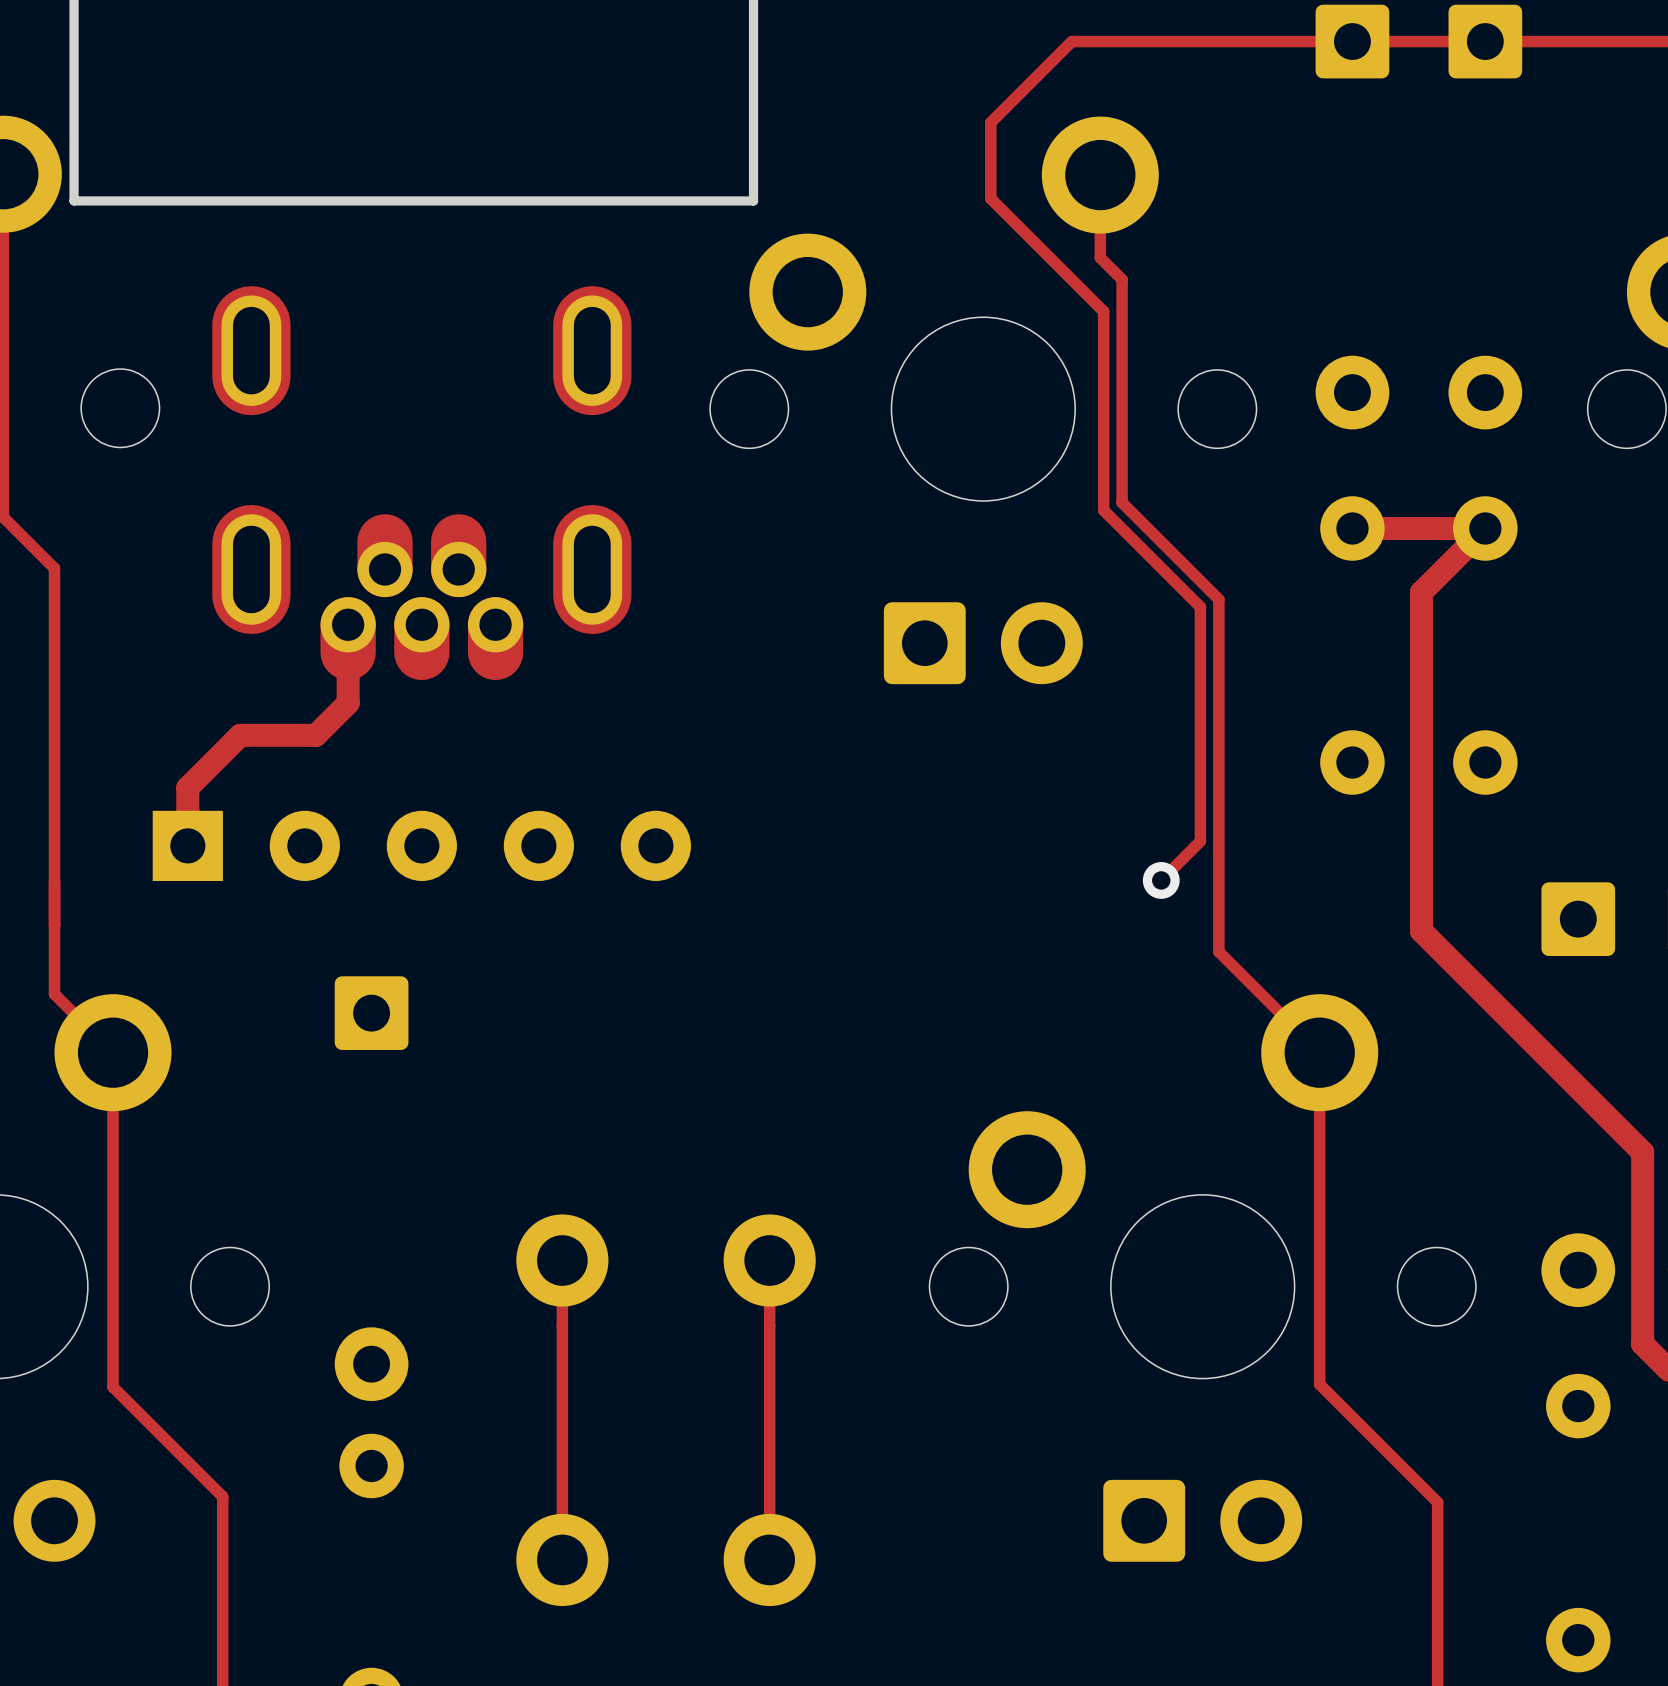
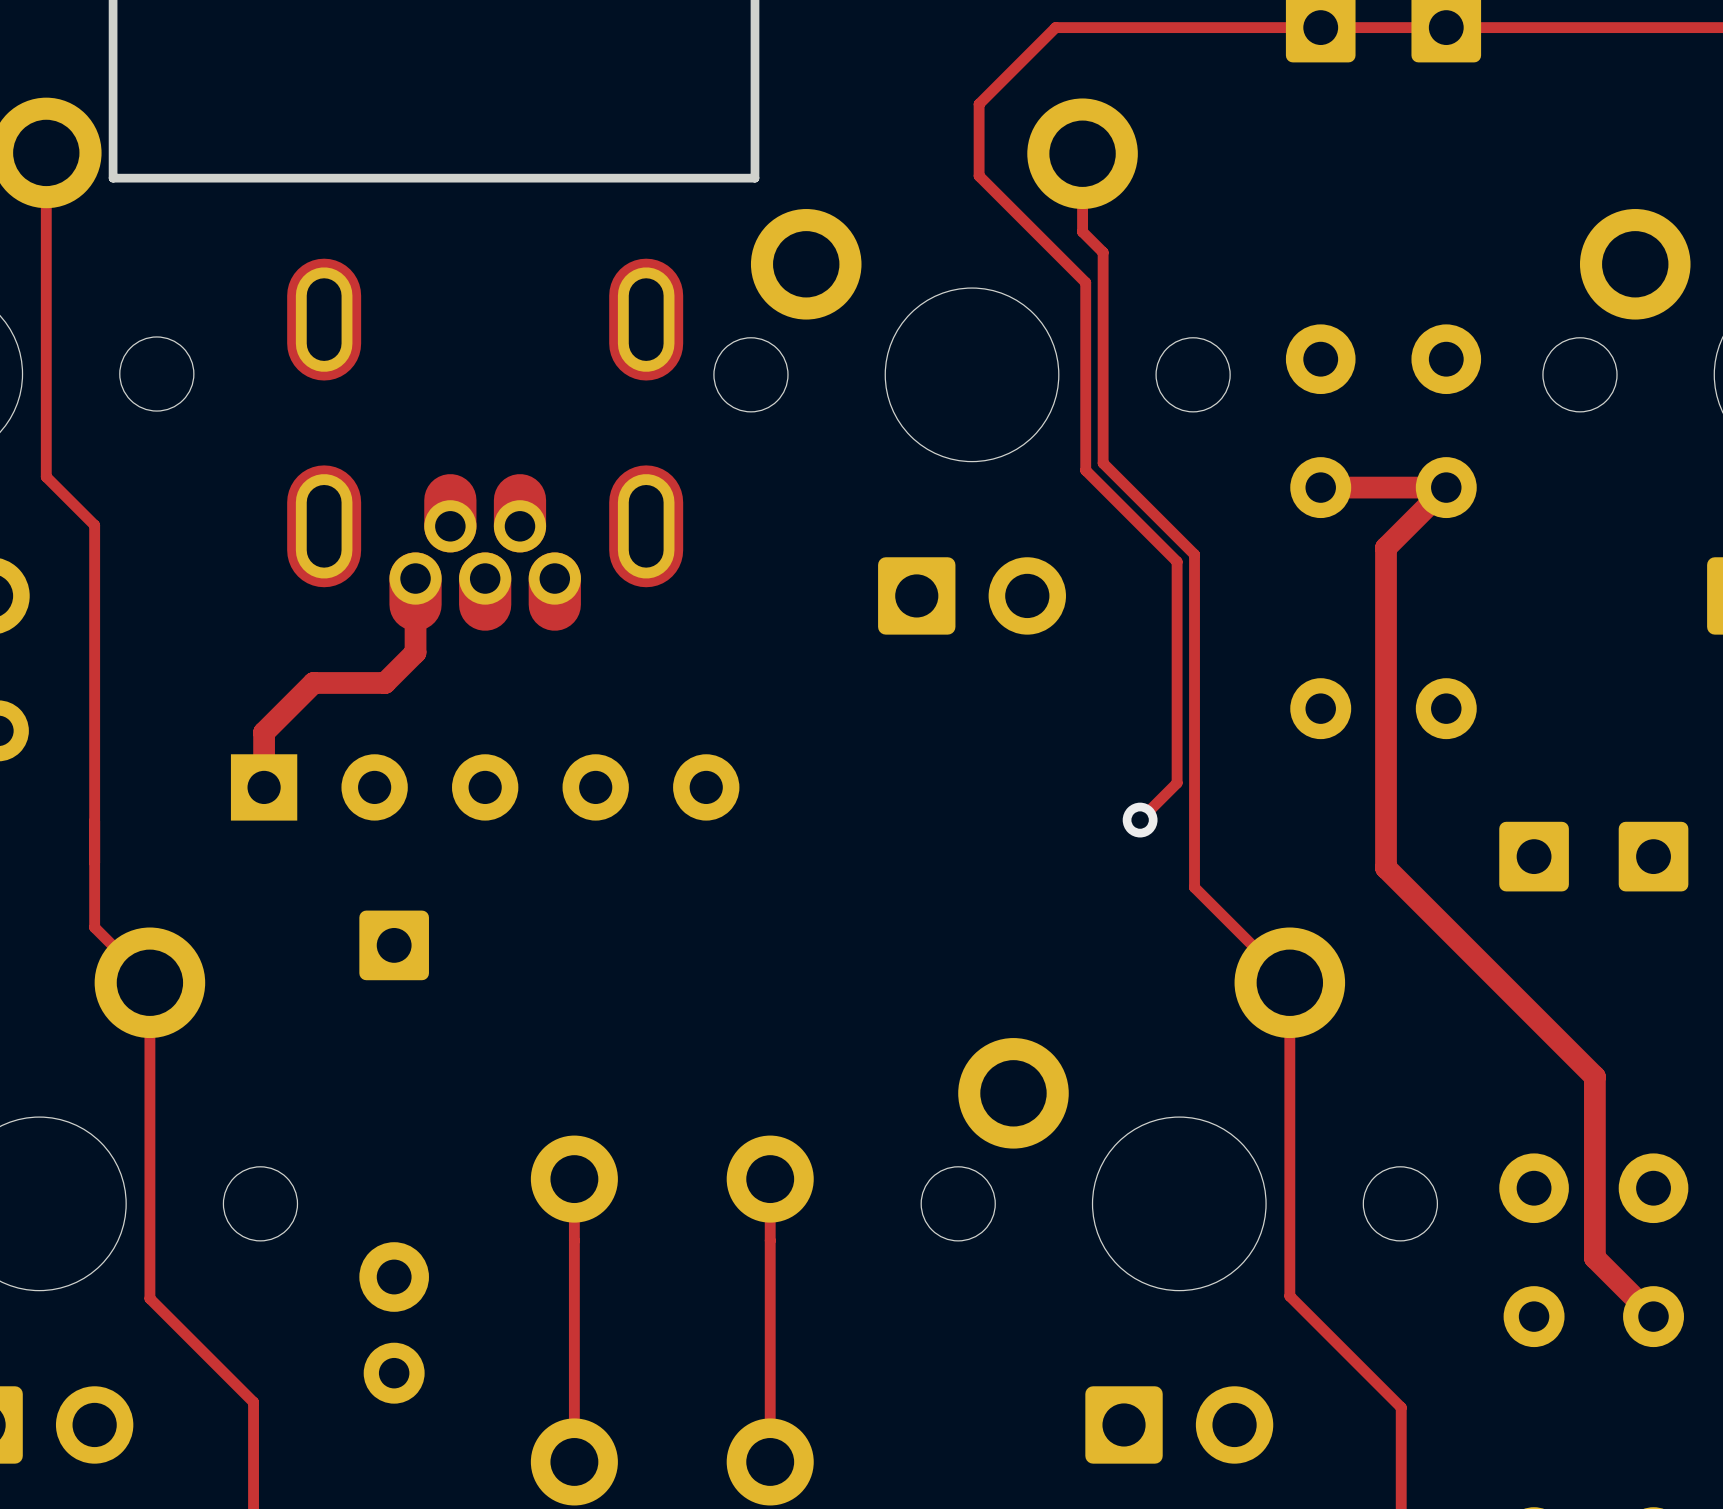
part position: (421, 483) -> (485, 444)
track: (348, 638) (348, 703) (315, 735) -> (415, 591) (415, 652) (385, 682) (341, 682)
track: (286, 735) (240, 735) (187, 787) (187, 845) -> (313, 682) (264, 732) (264, 787)
part position: (421, 845) -> (485, 787)

